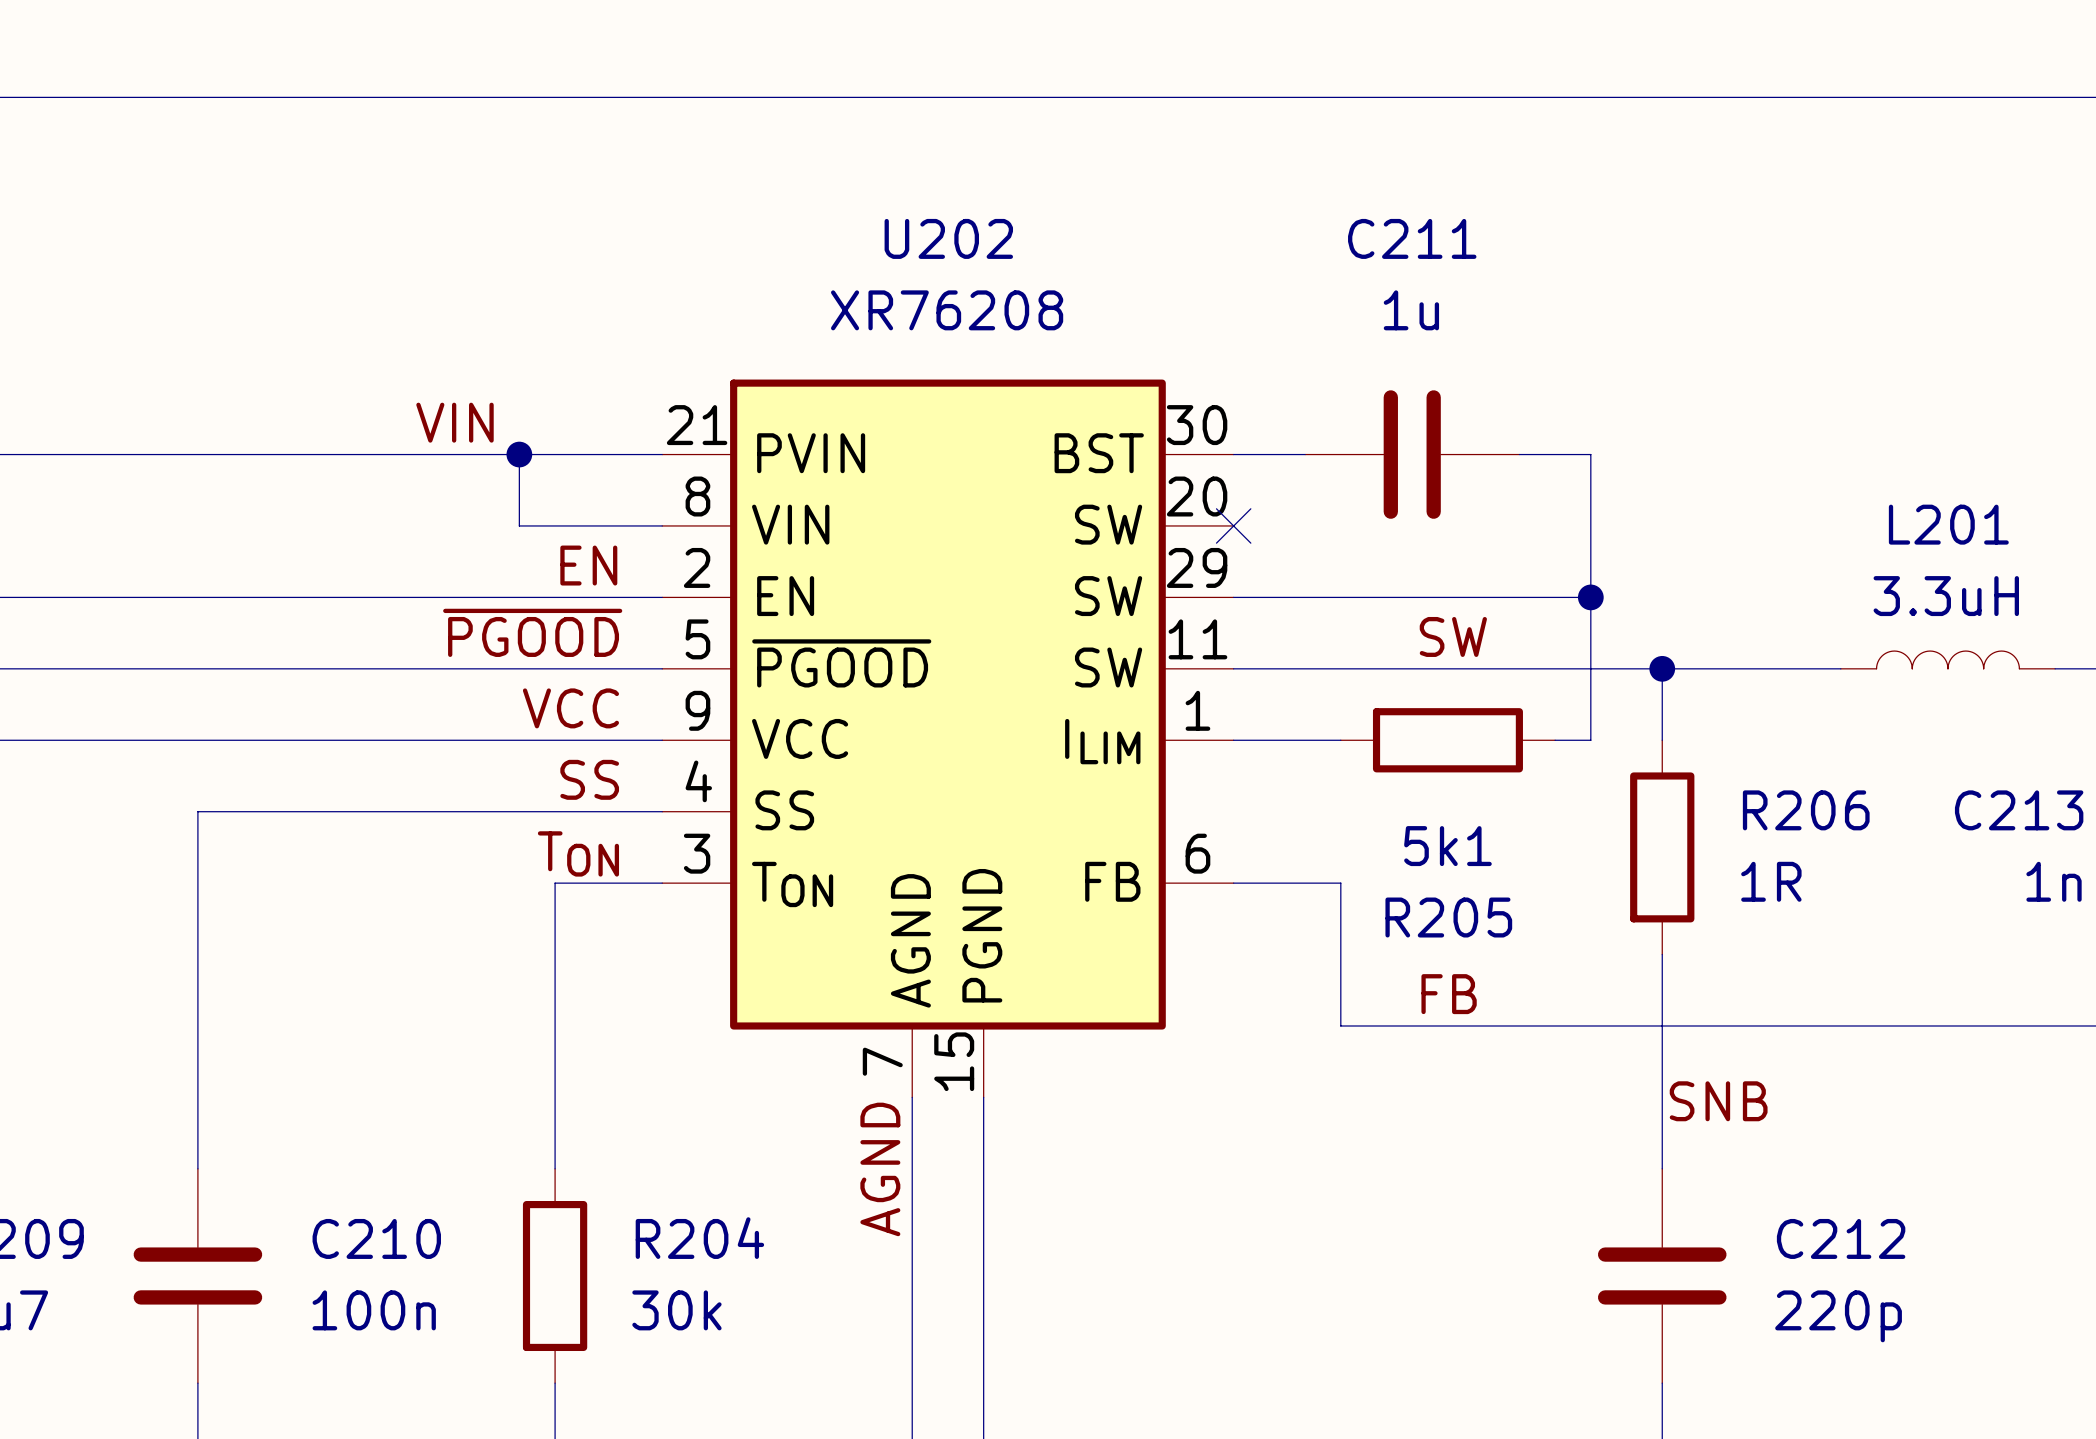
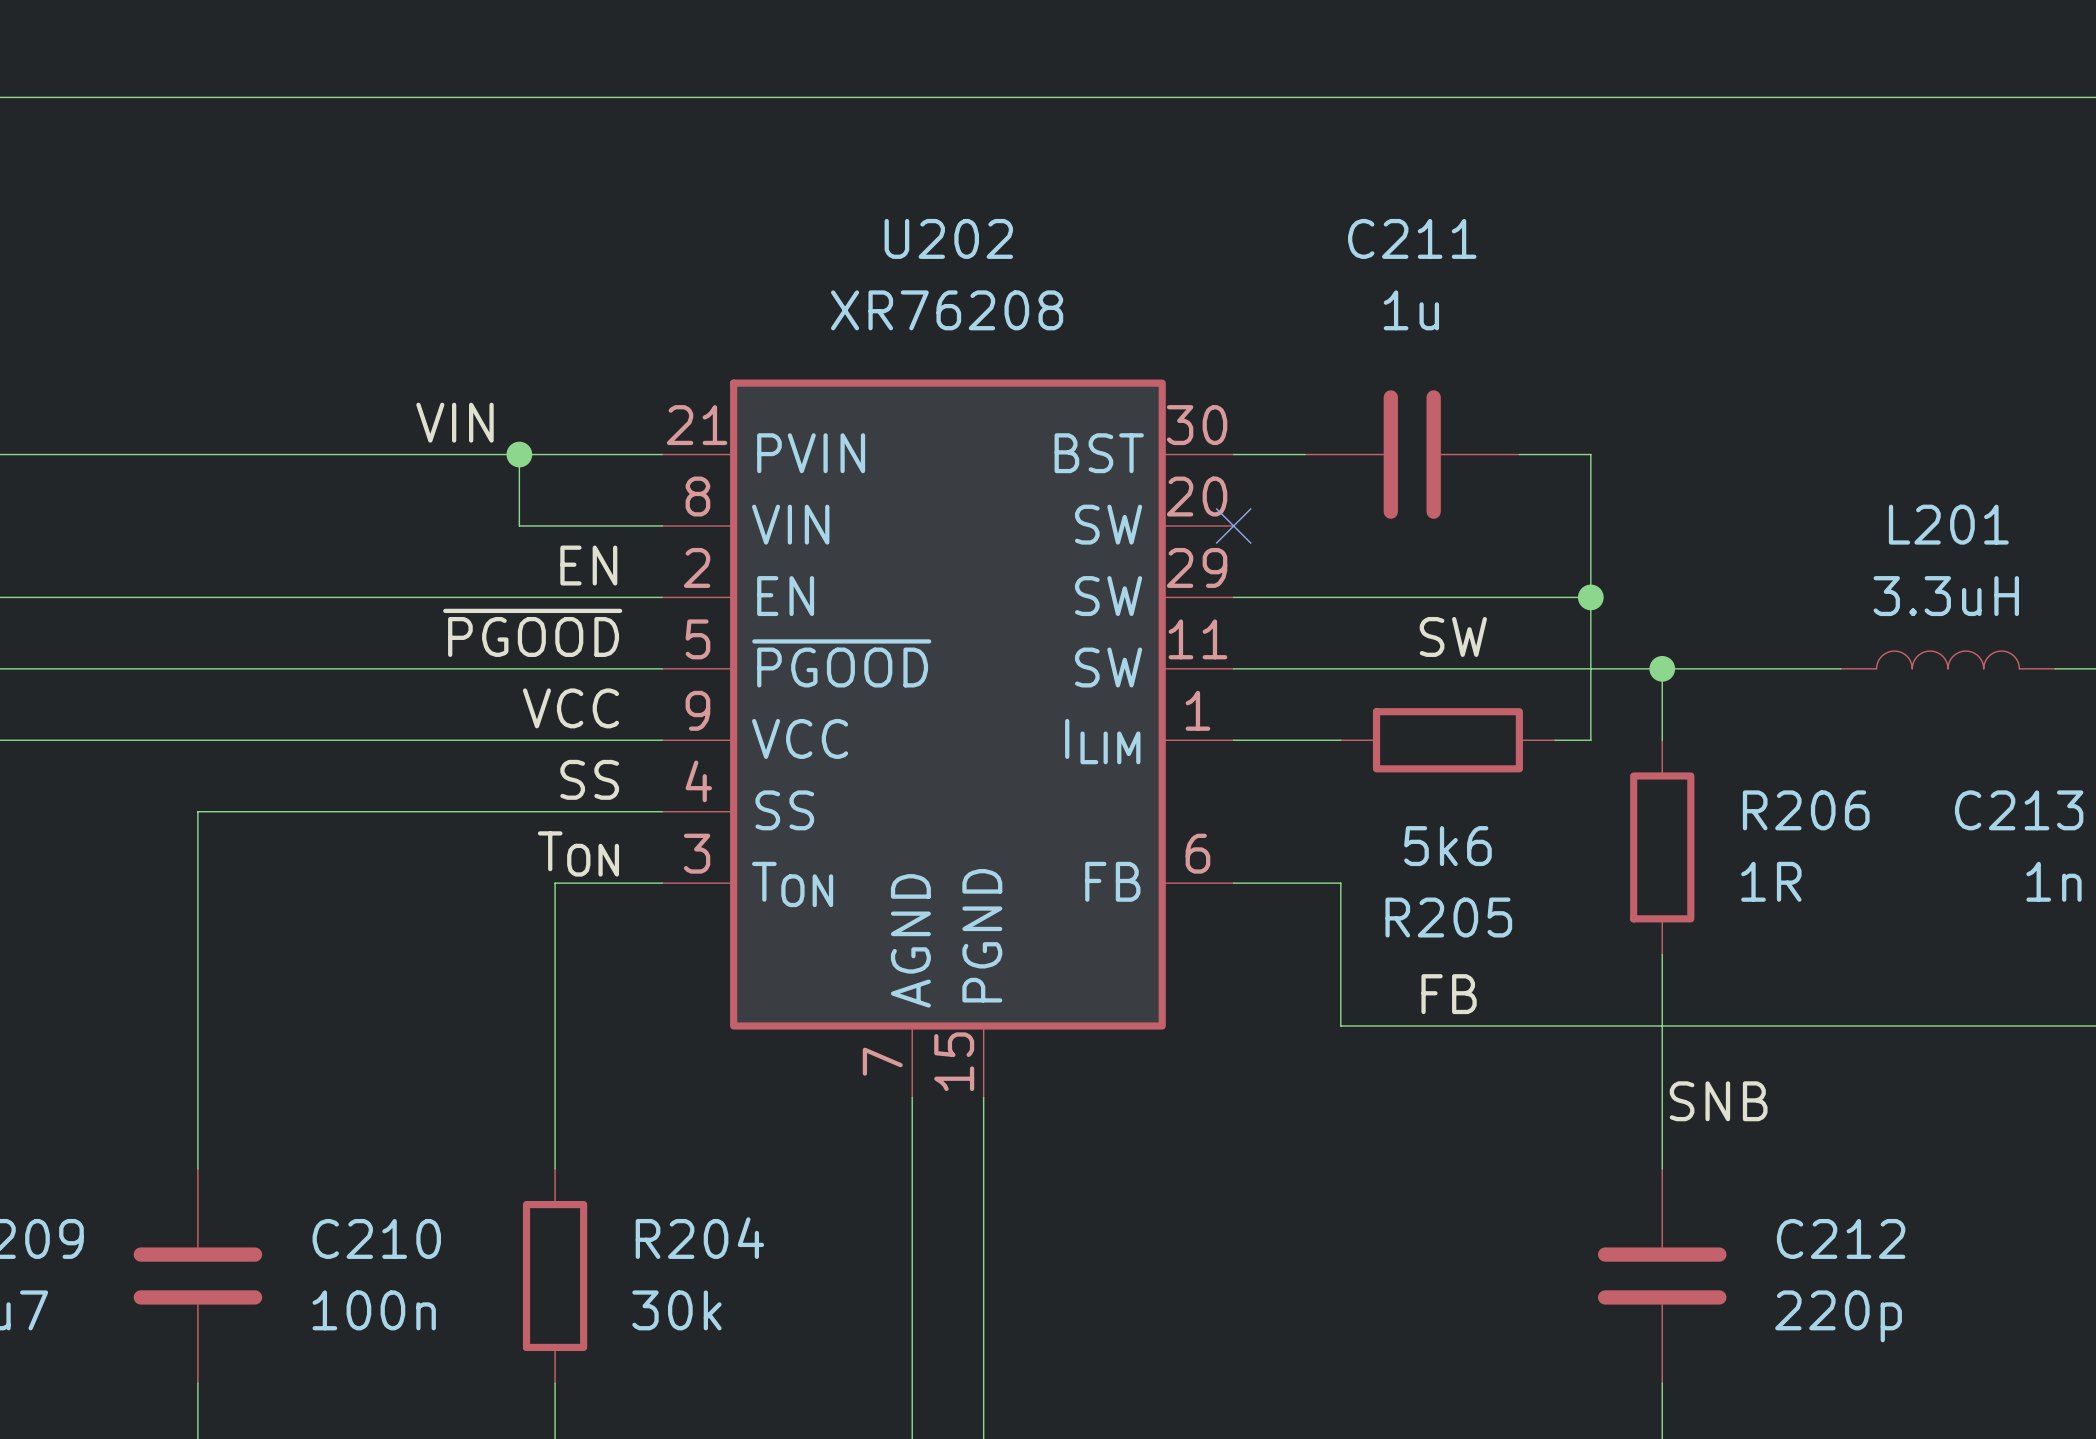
R205 value: 5k1 (1447, 846) -> 5k6 (1447, 846)
label: AGND (880, 1169) -> none

